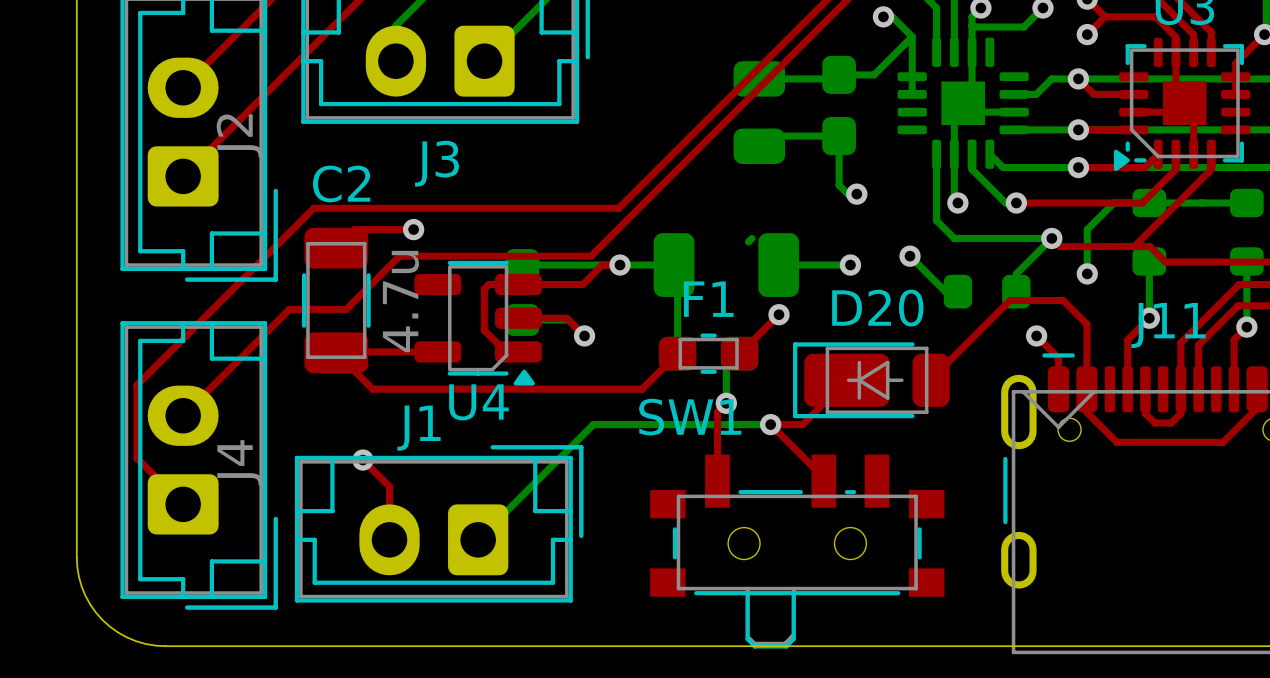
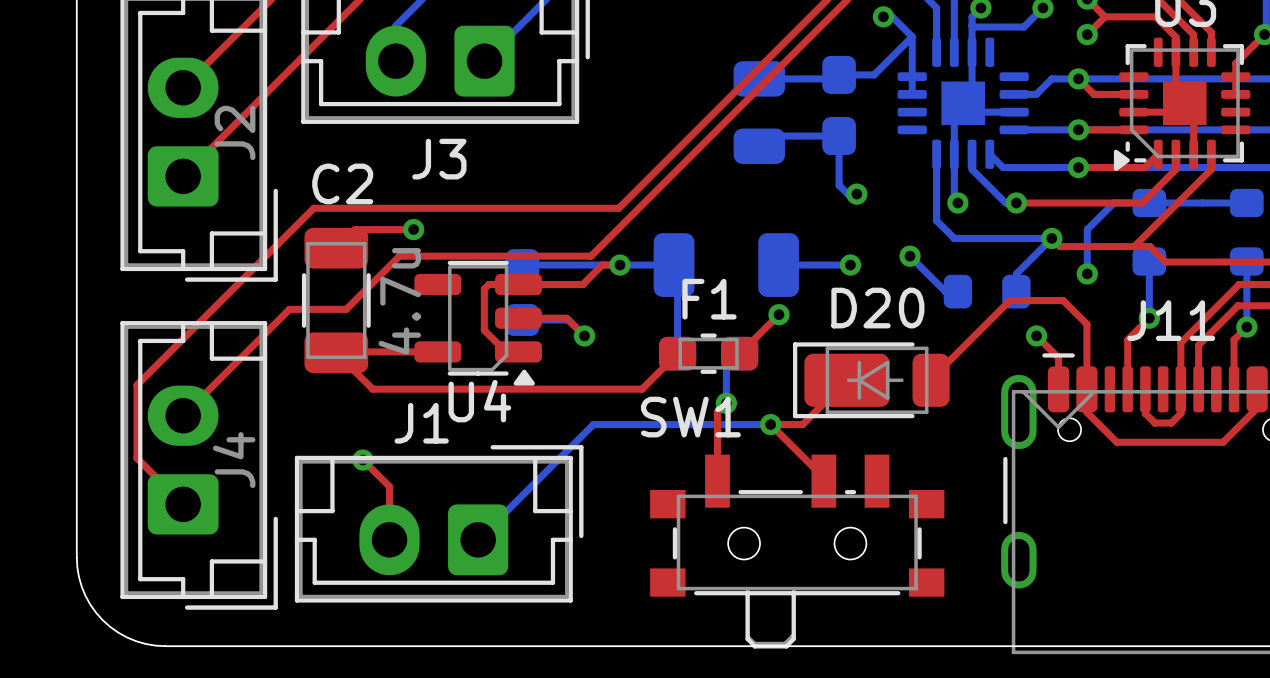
bottom track: (752, 238) (748, 242) -> none

